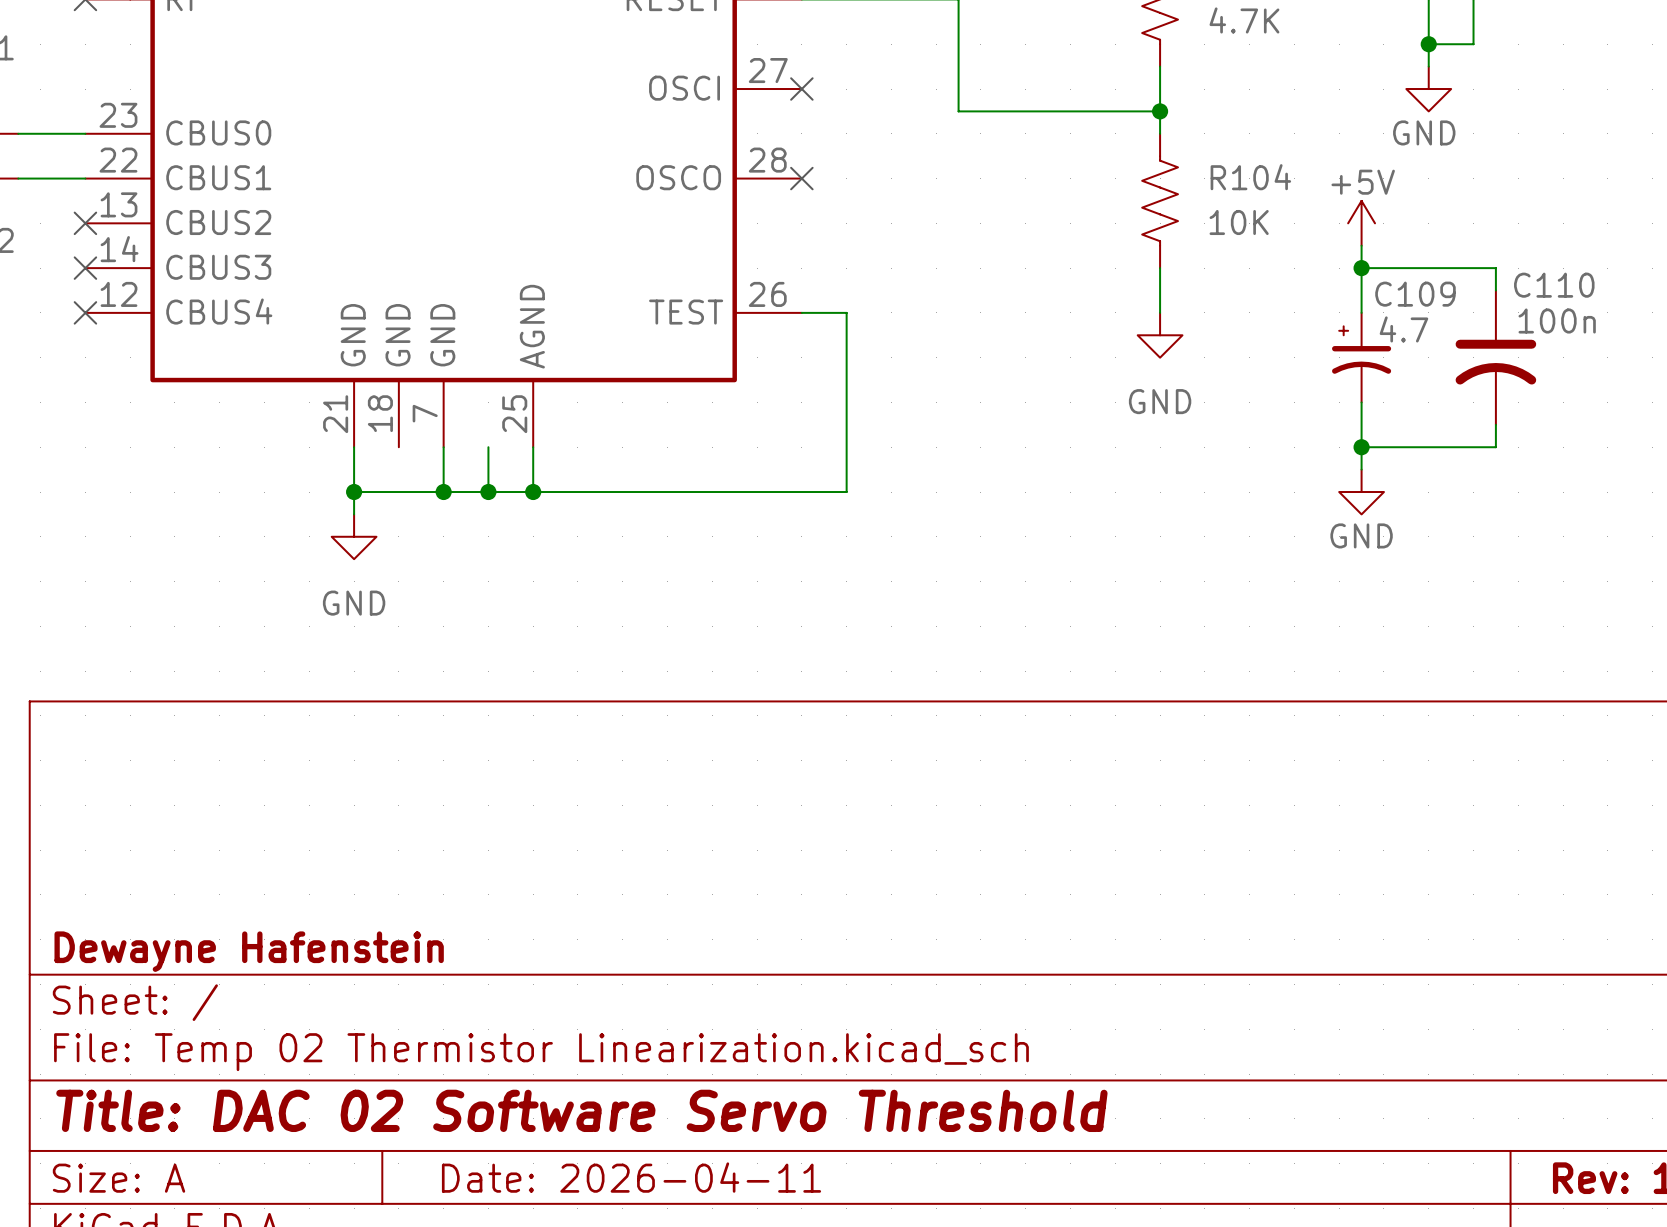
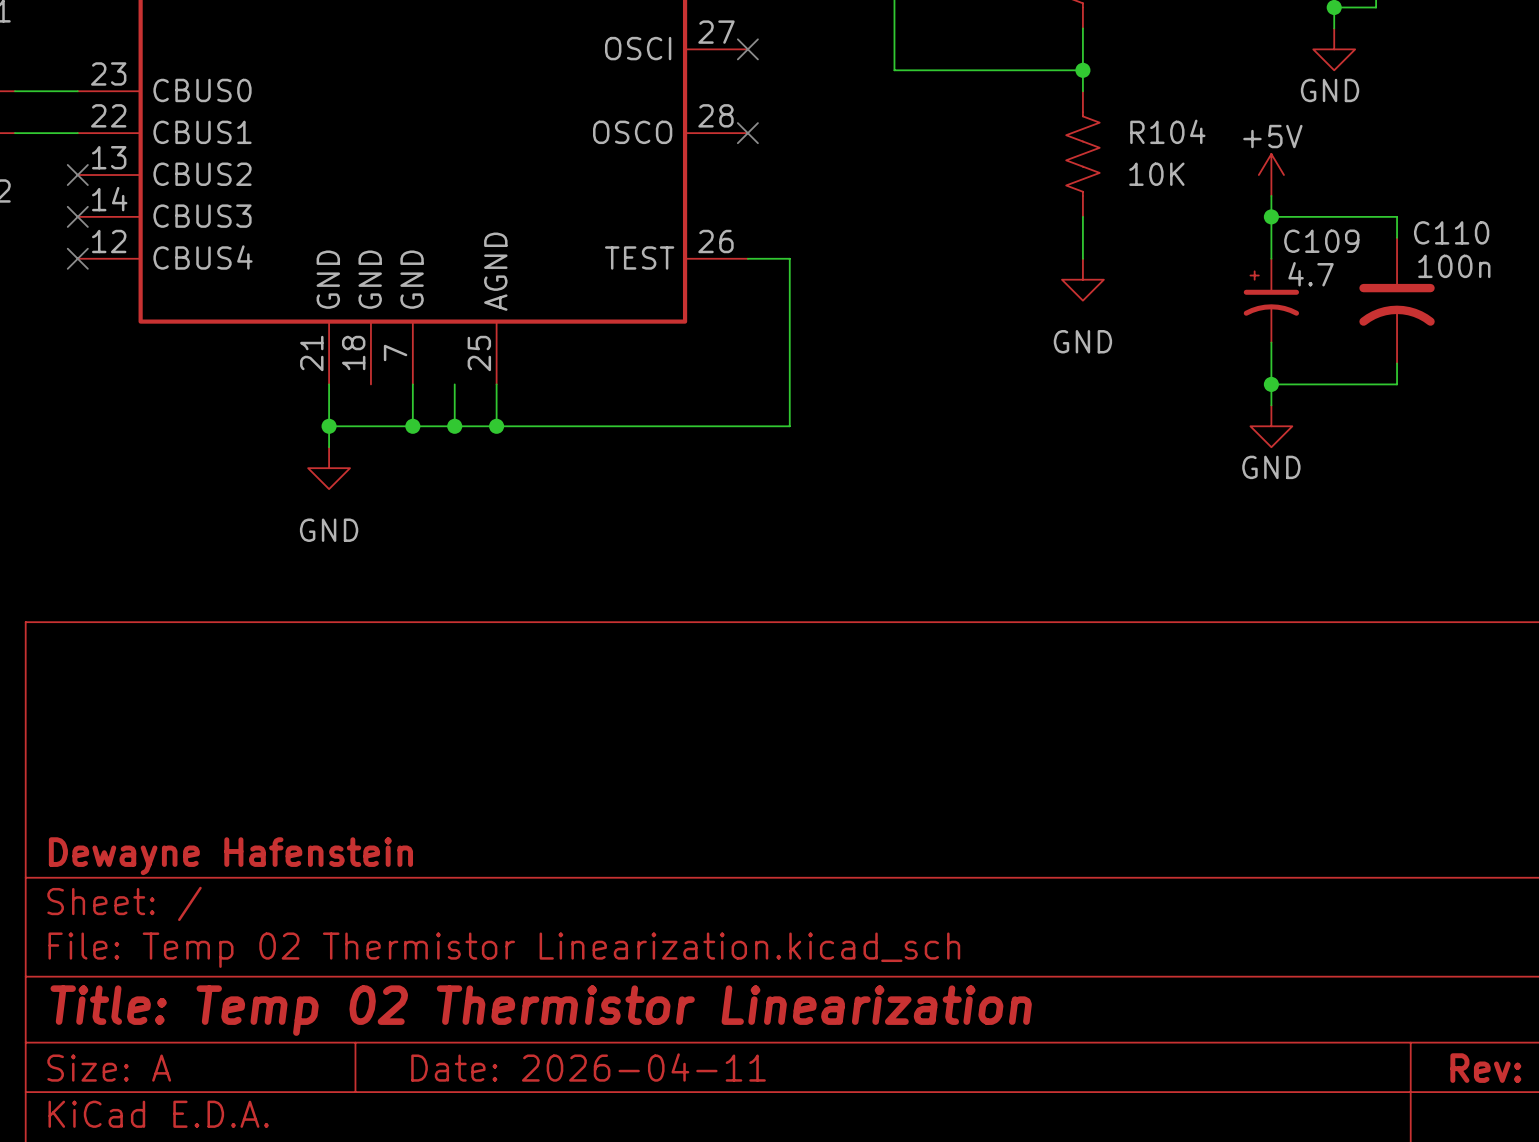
title block: Title: DAC 02 Software Servo Threshold (581, 1110) -> Title: Temp 02 Thermistor Linearization (541, 1010)

